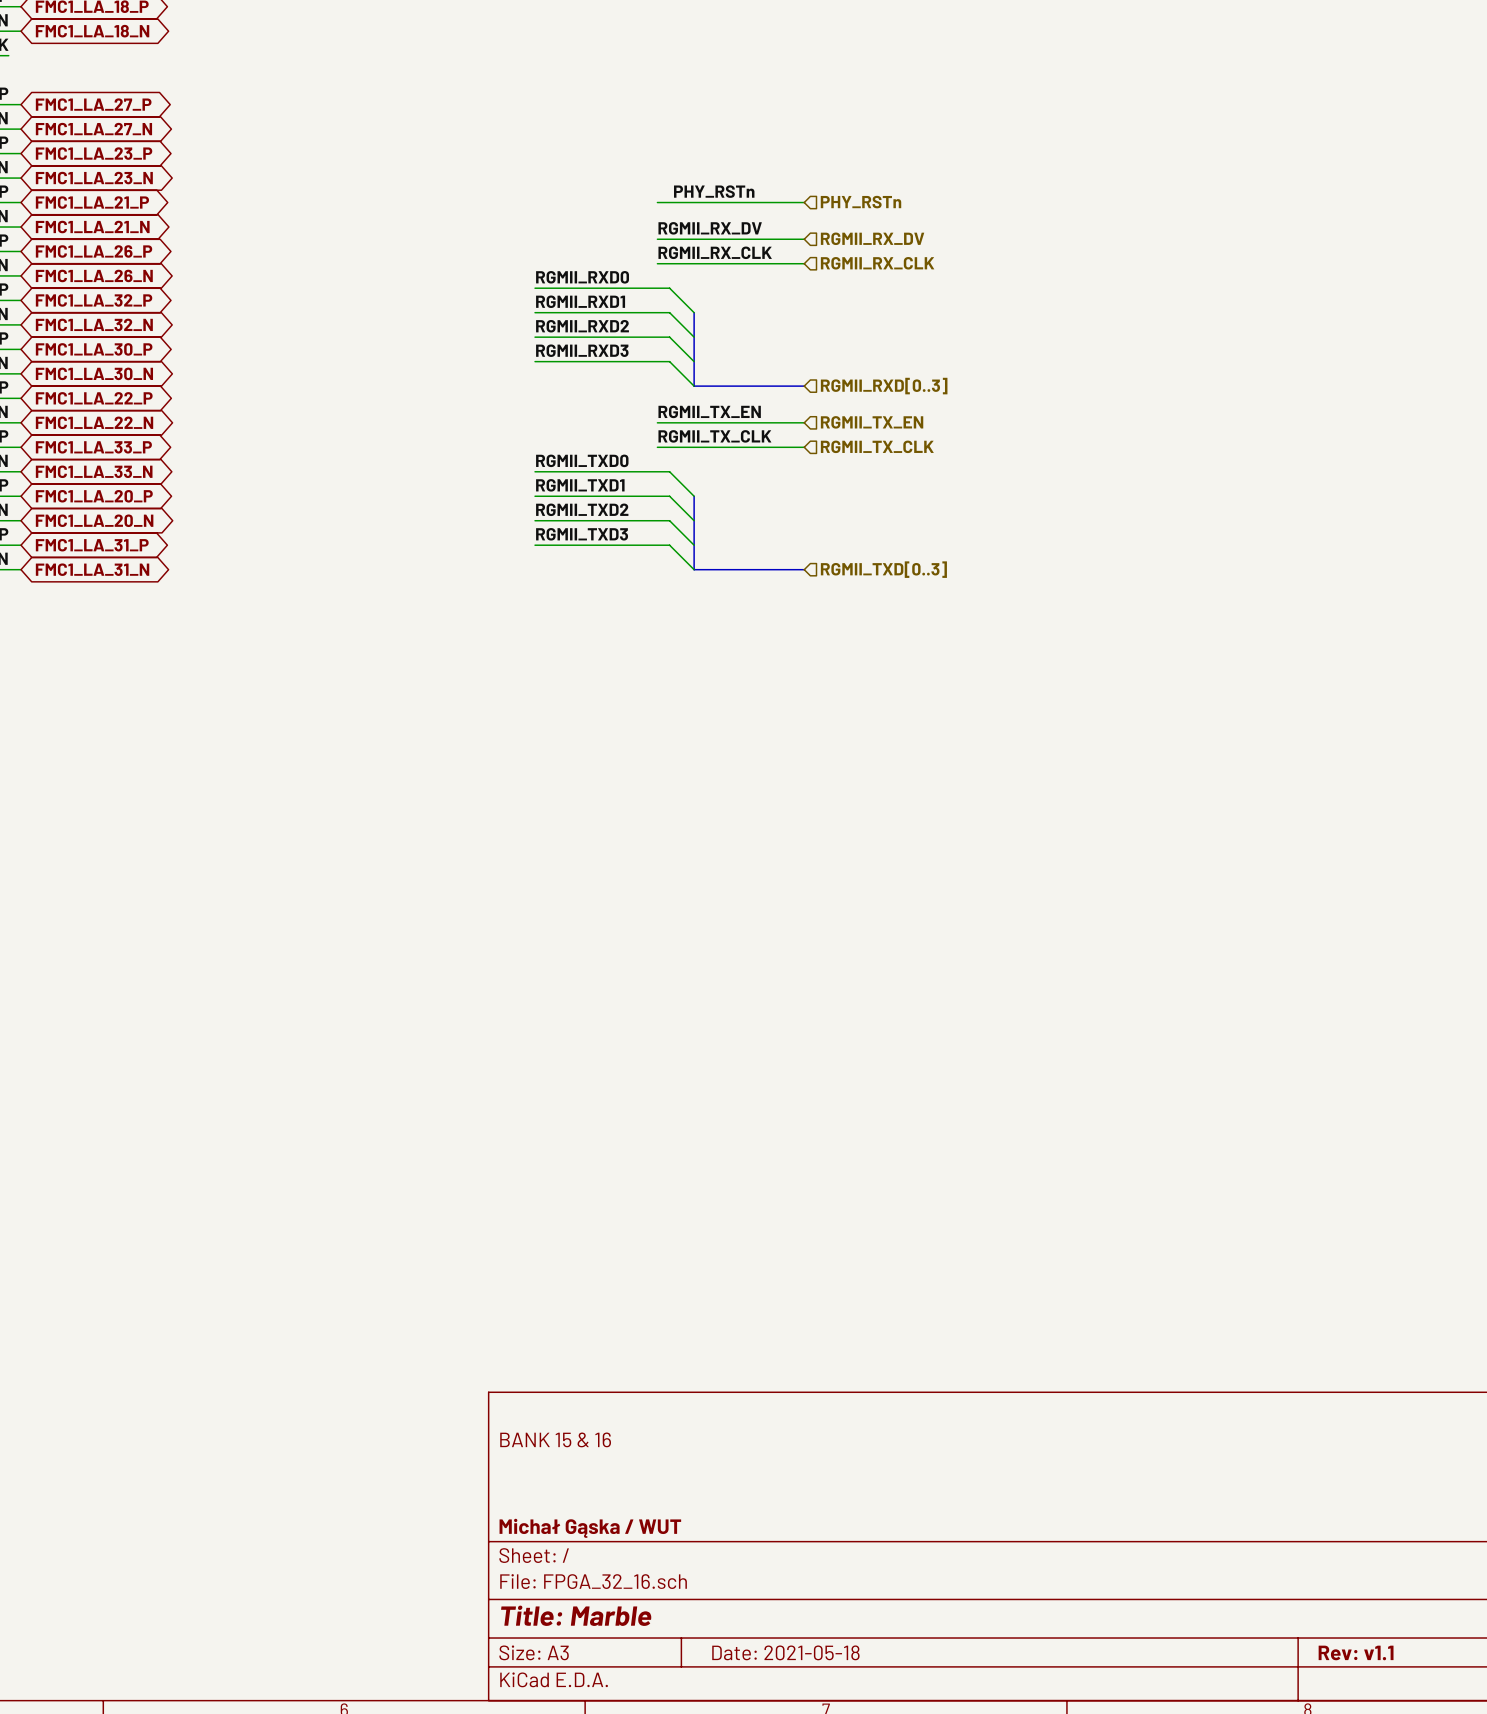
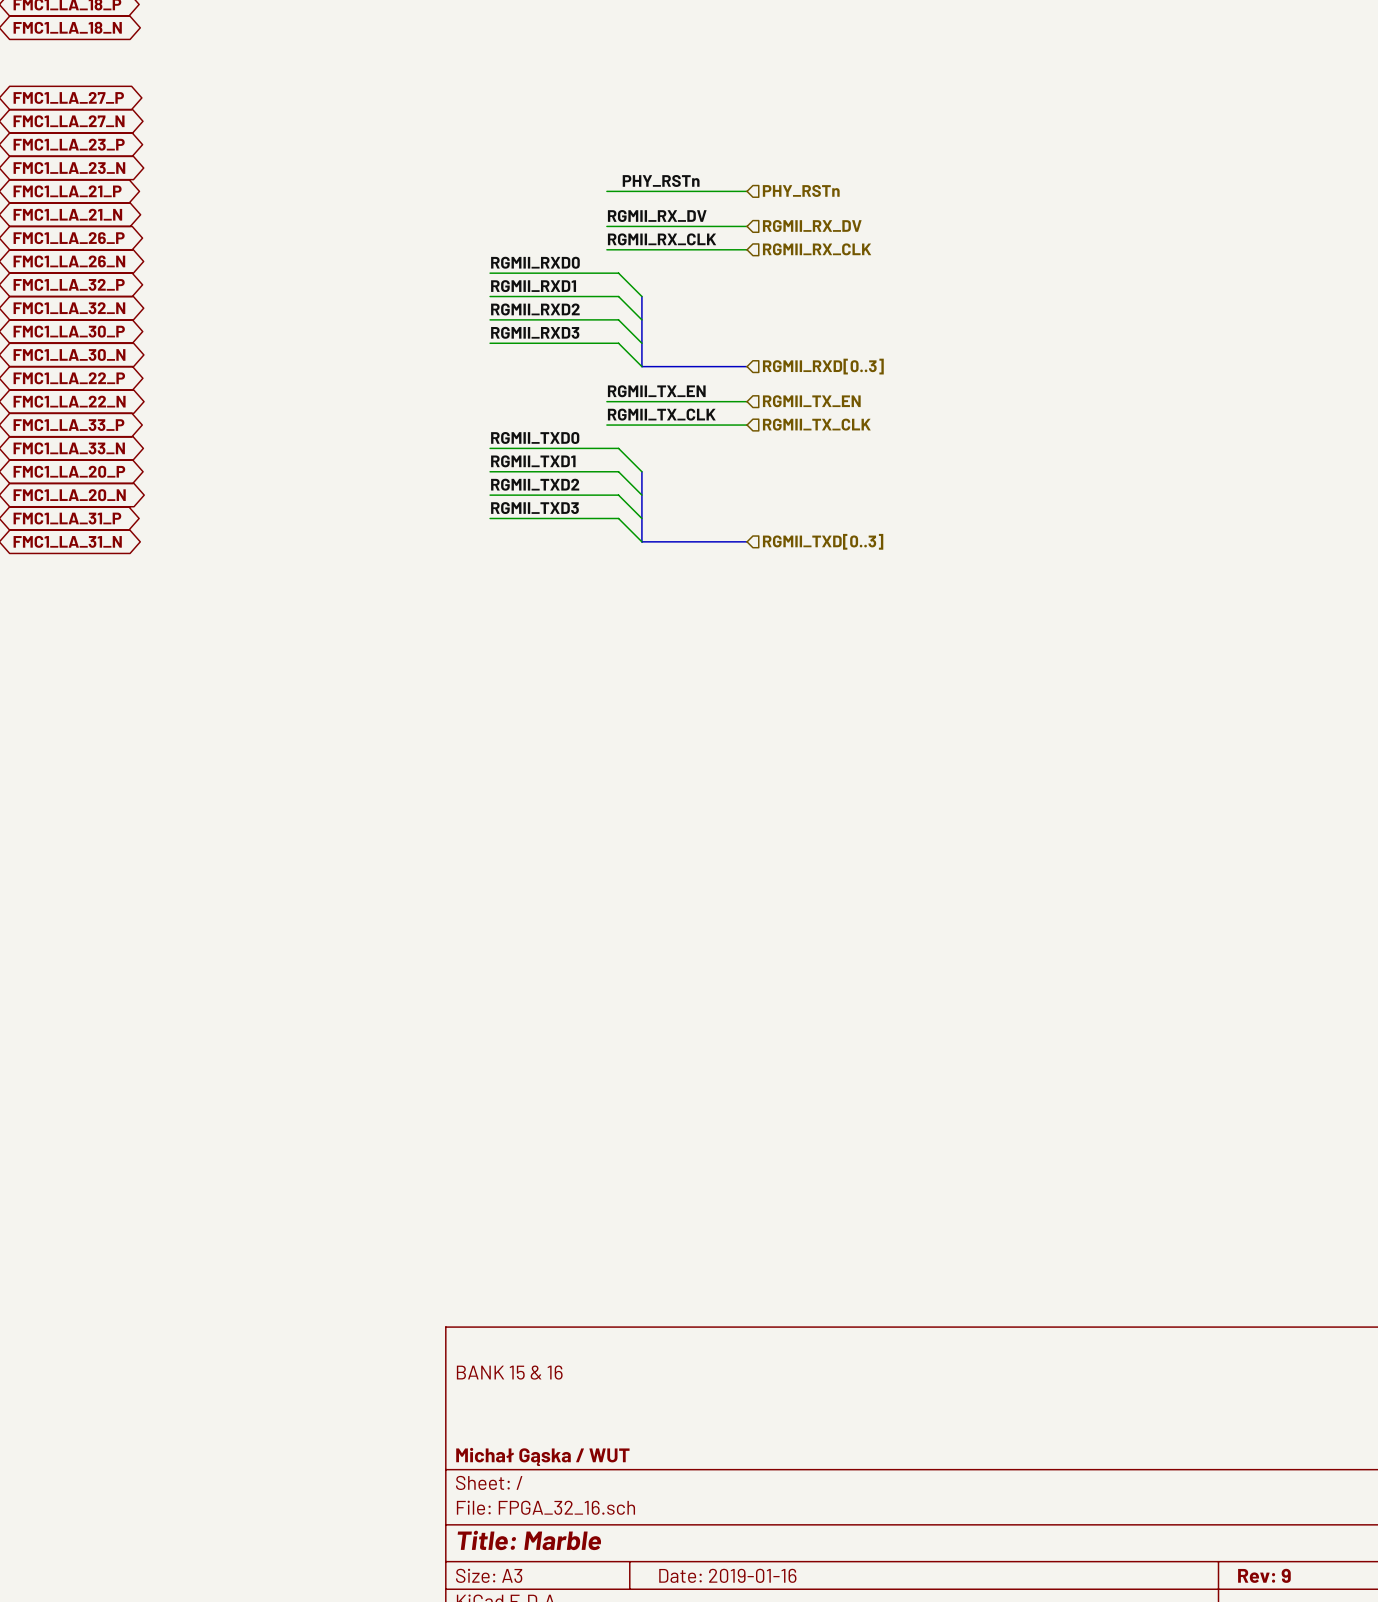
title block: Date: 2021-05-18 (785, 1652) -> Date: 2019-01-16 (727, 1575)
title block: Rev: v1.1 (1356, 1652) -> Rev: 9 (1264, 1575)

